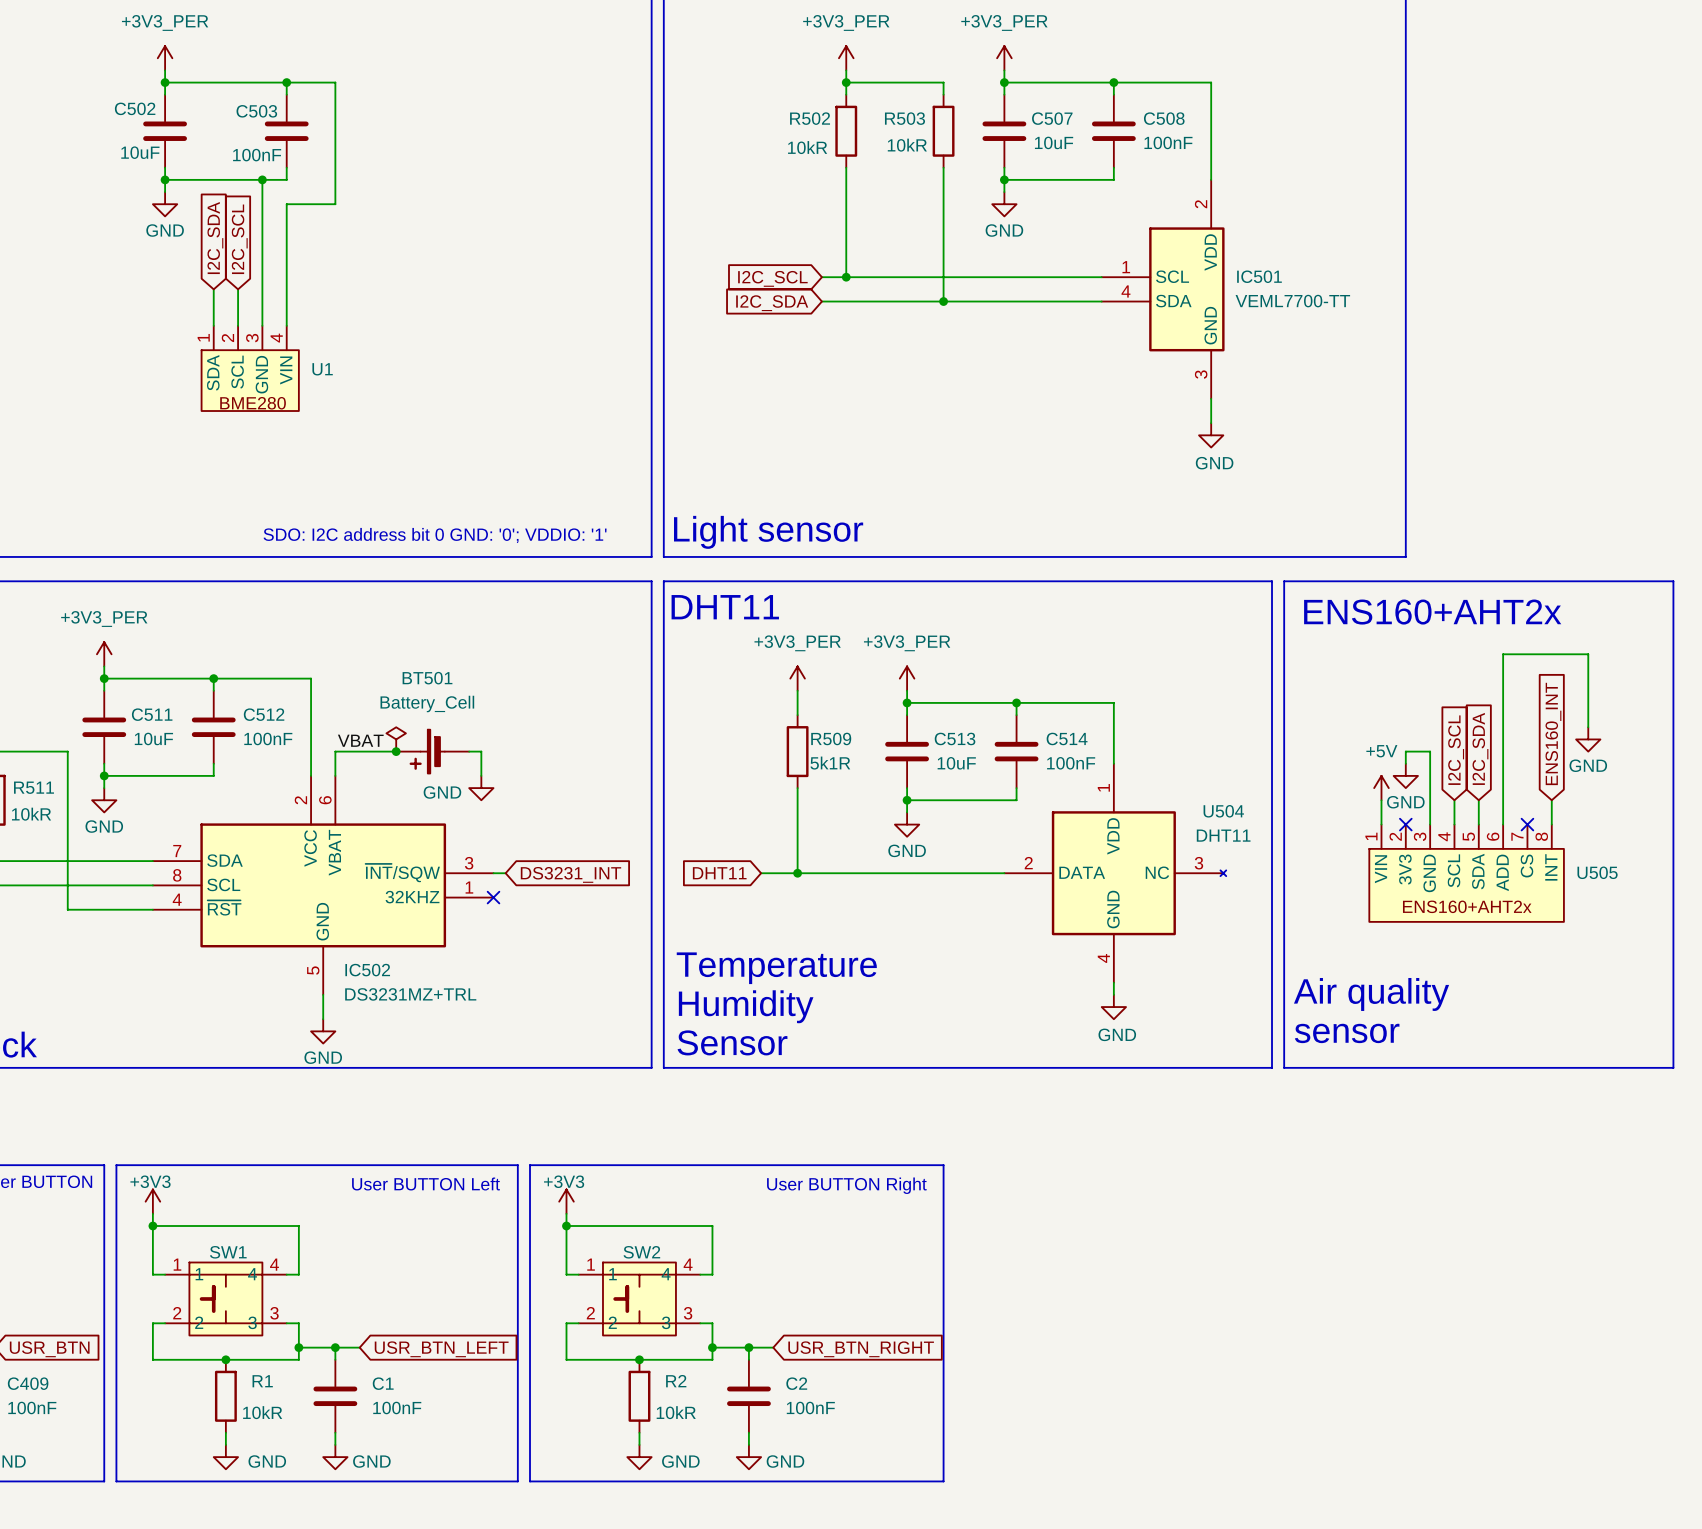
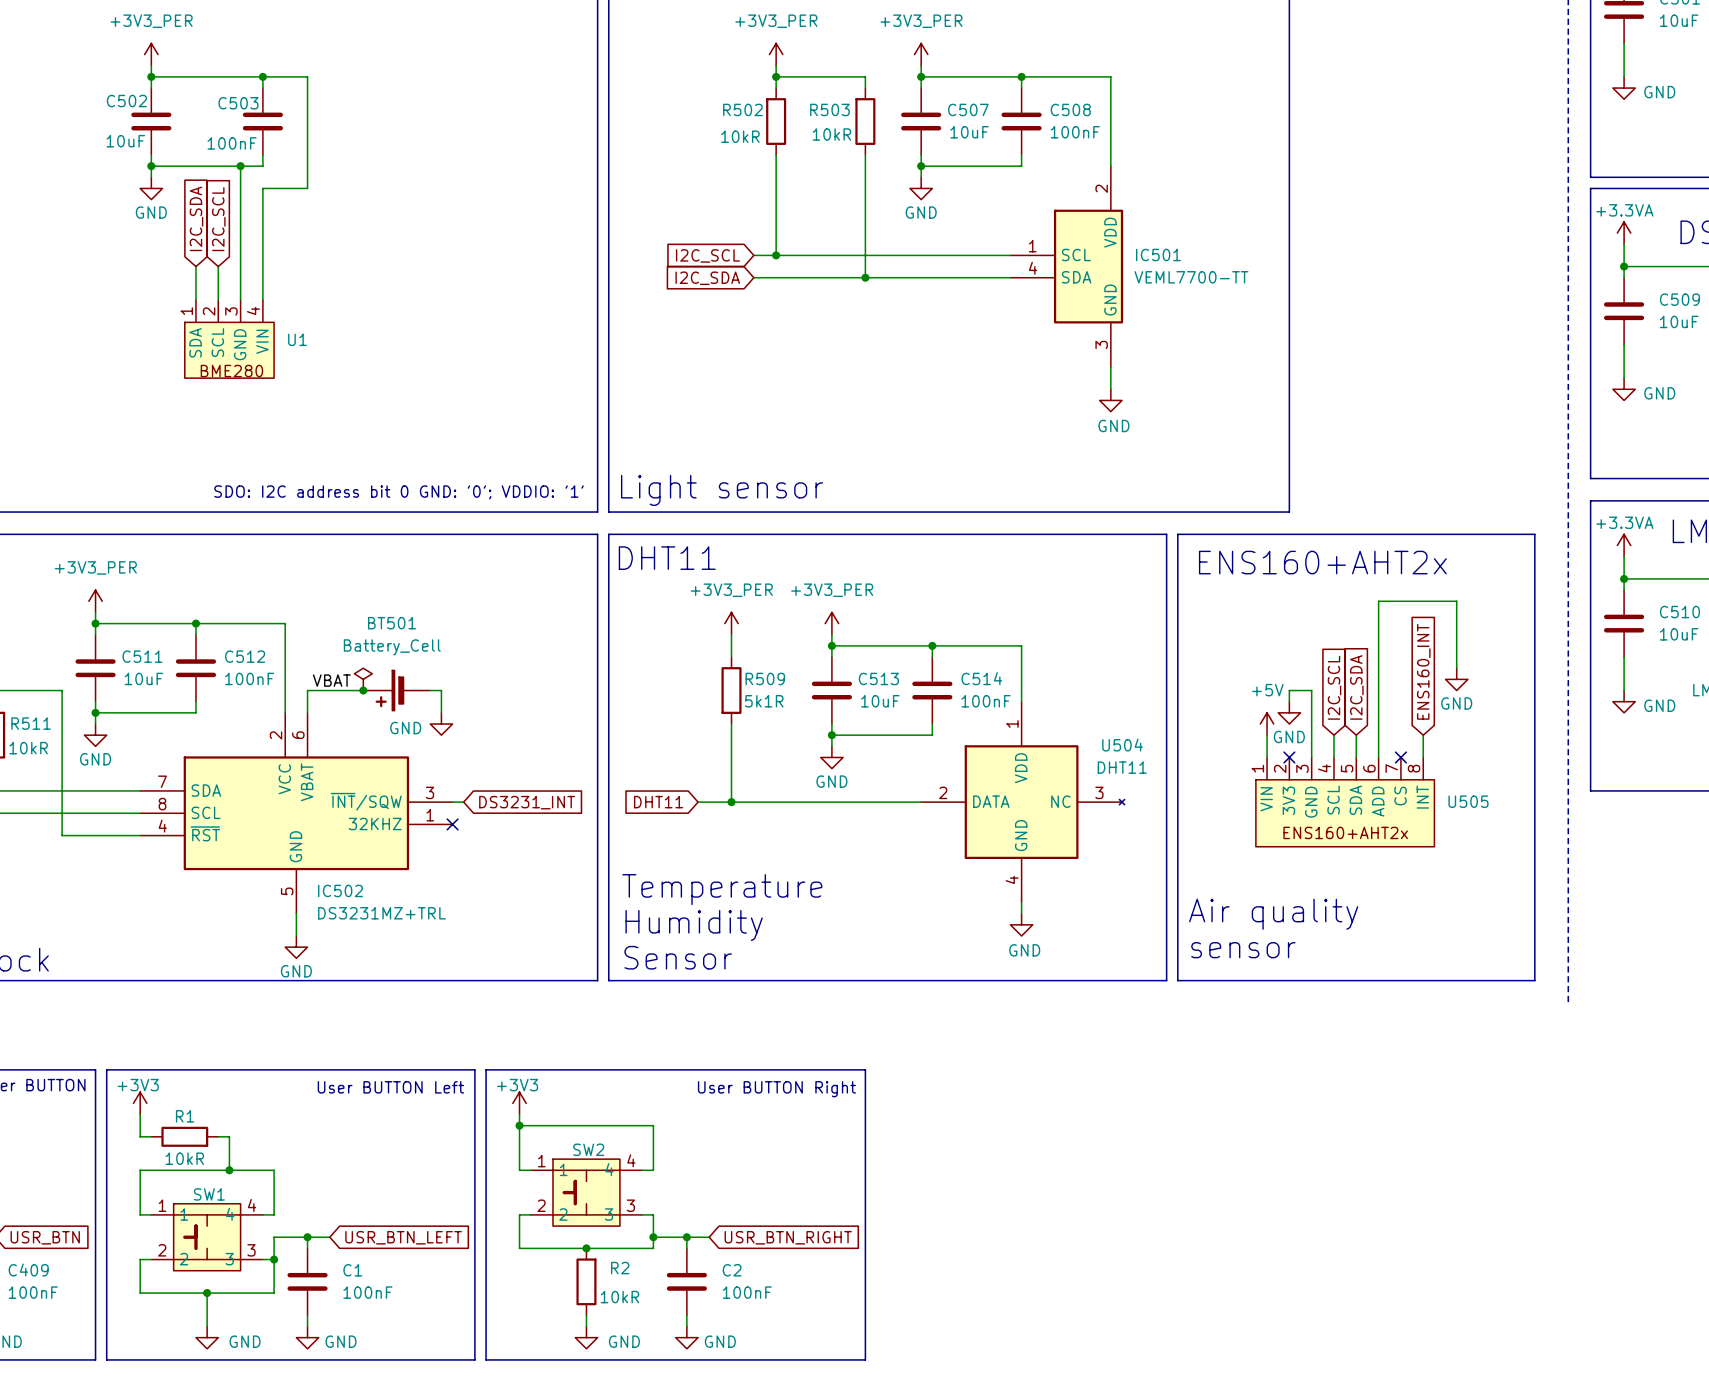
wire: (152, 1225) (298, 1225) (298, 1274) -> none
junction: (152, 1225) -> none
wire: (152, 1238) (152, 1274) -> (140, 1136) (151, 1136)
wire: none -> (218, 1136) (229, 1136) (229, 1170)
wire: none -> (140, 1170) (140, 1214)
junction: none -> (229, 1170)
SW1 position: (225, 1298) -> (207, 1237)
wire: (152, 1323) (152, 1359) (298, 1359) -> (151, 1259) (140, 1259) (140, 1293) (274, 1293) (274, 1248)
wire: (298, 1323) (298, 1347) -> (274, 1214) (274, 1170)
junction position: (298, 1347) -> (274, 1259)
junction: (225, 1359) -> none
wire: none -> (262, 1259) (274, 1259)
R1 name position: R1 (262, 1381) -> R1 (185, 1116)
R1 rotation: 0° (225, 1396) -> 90° clockwise (184, 1136)
R1 position: (225, 1396) -> (184, 1136)
junction: none -> (207, 1293)
R1 value position: 10kR (262, 1412) -> 10kR (184, 1158)

